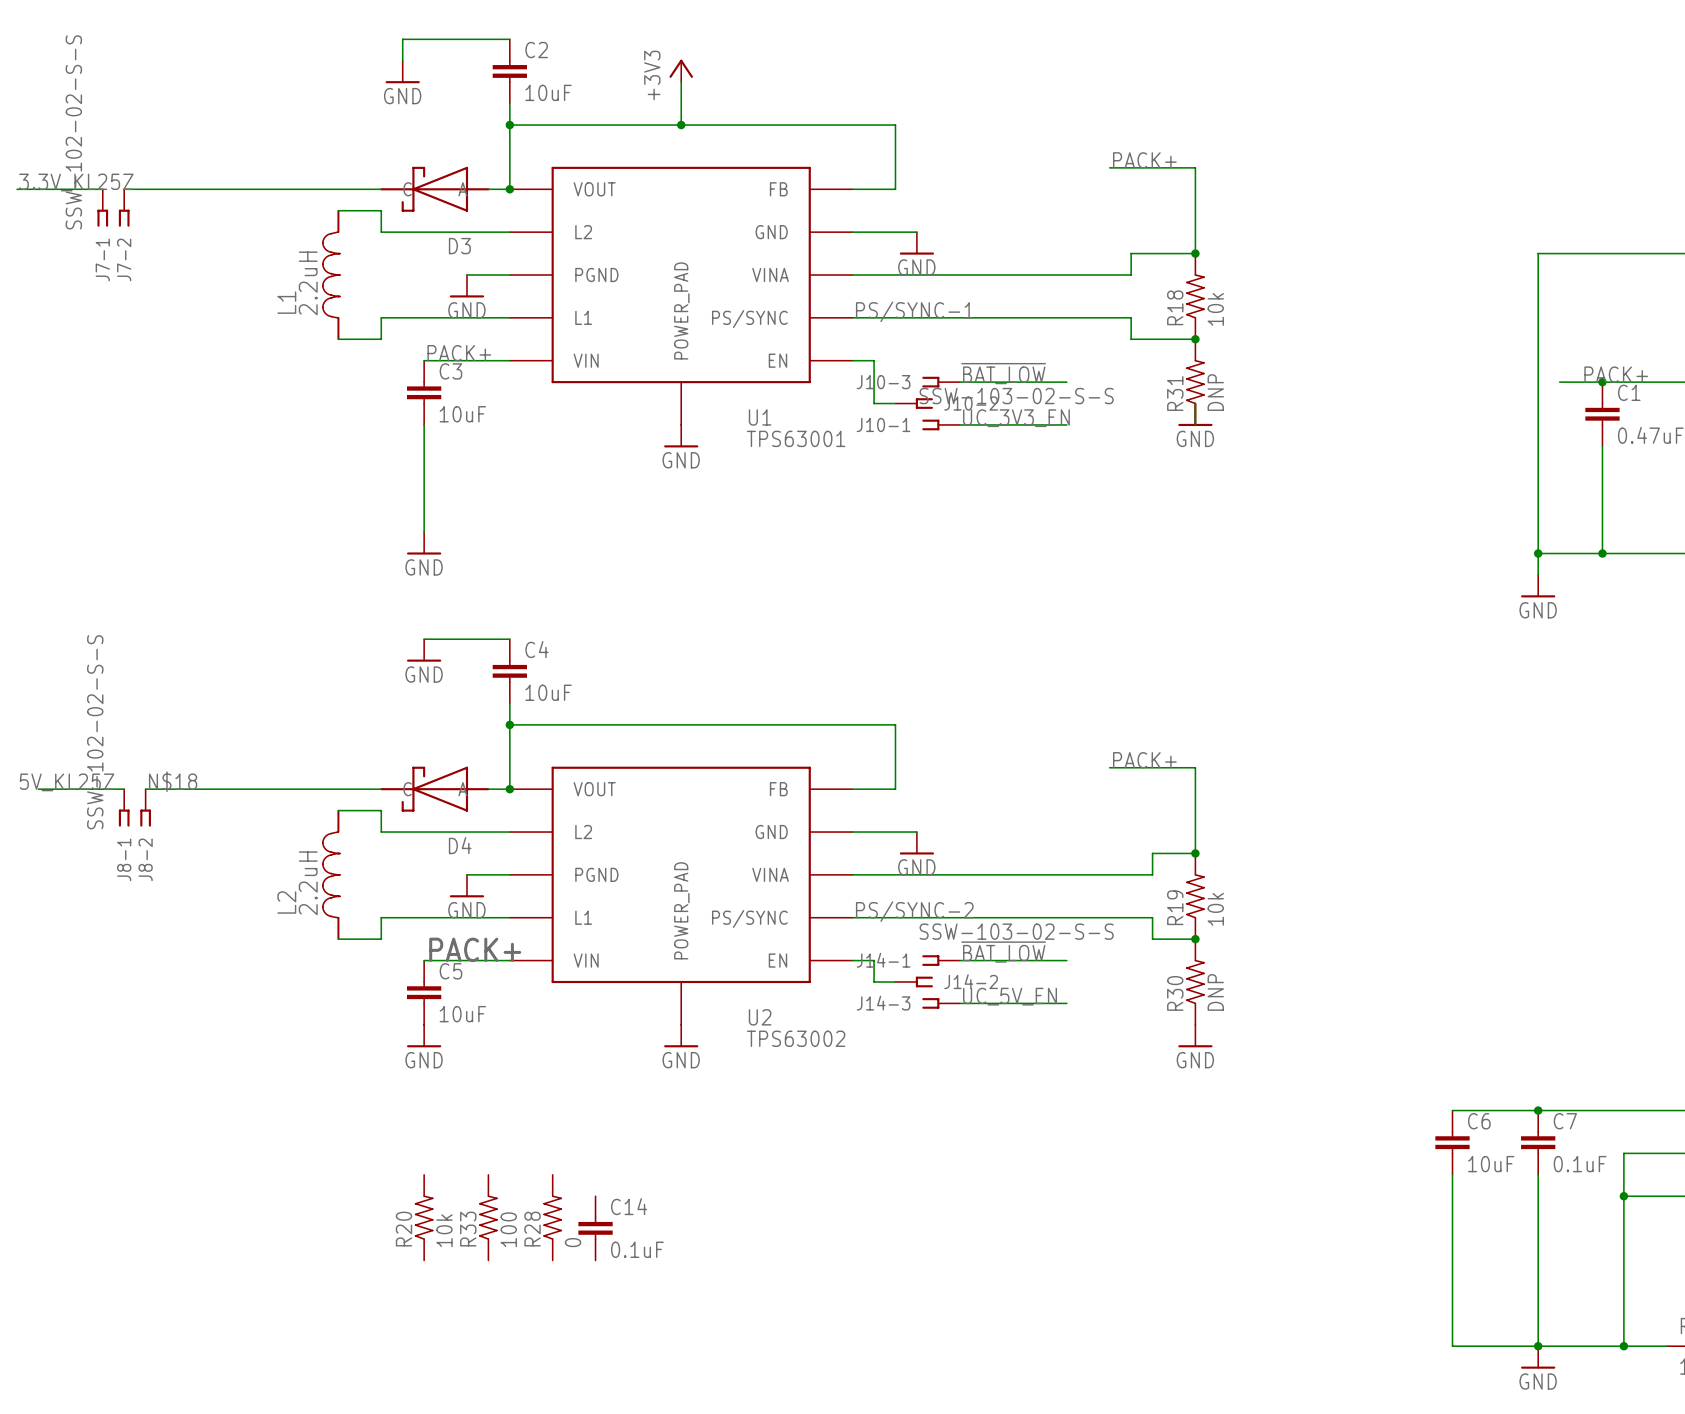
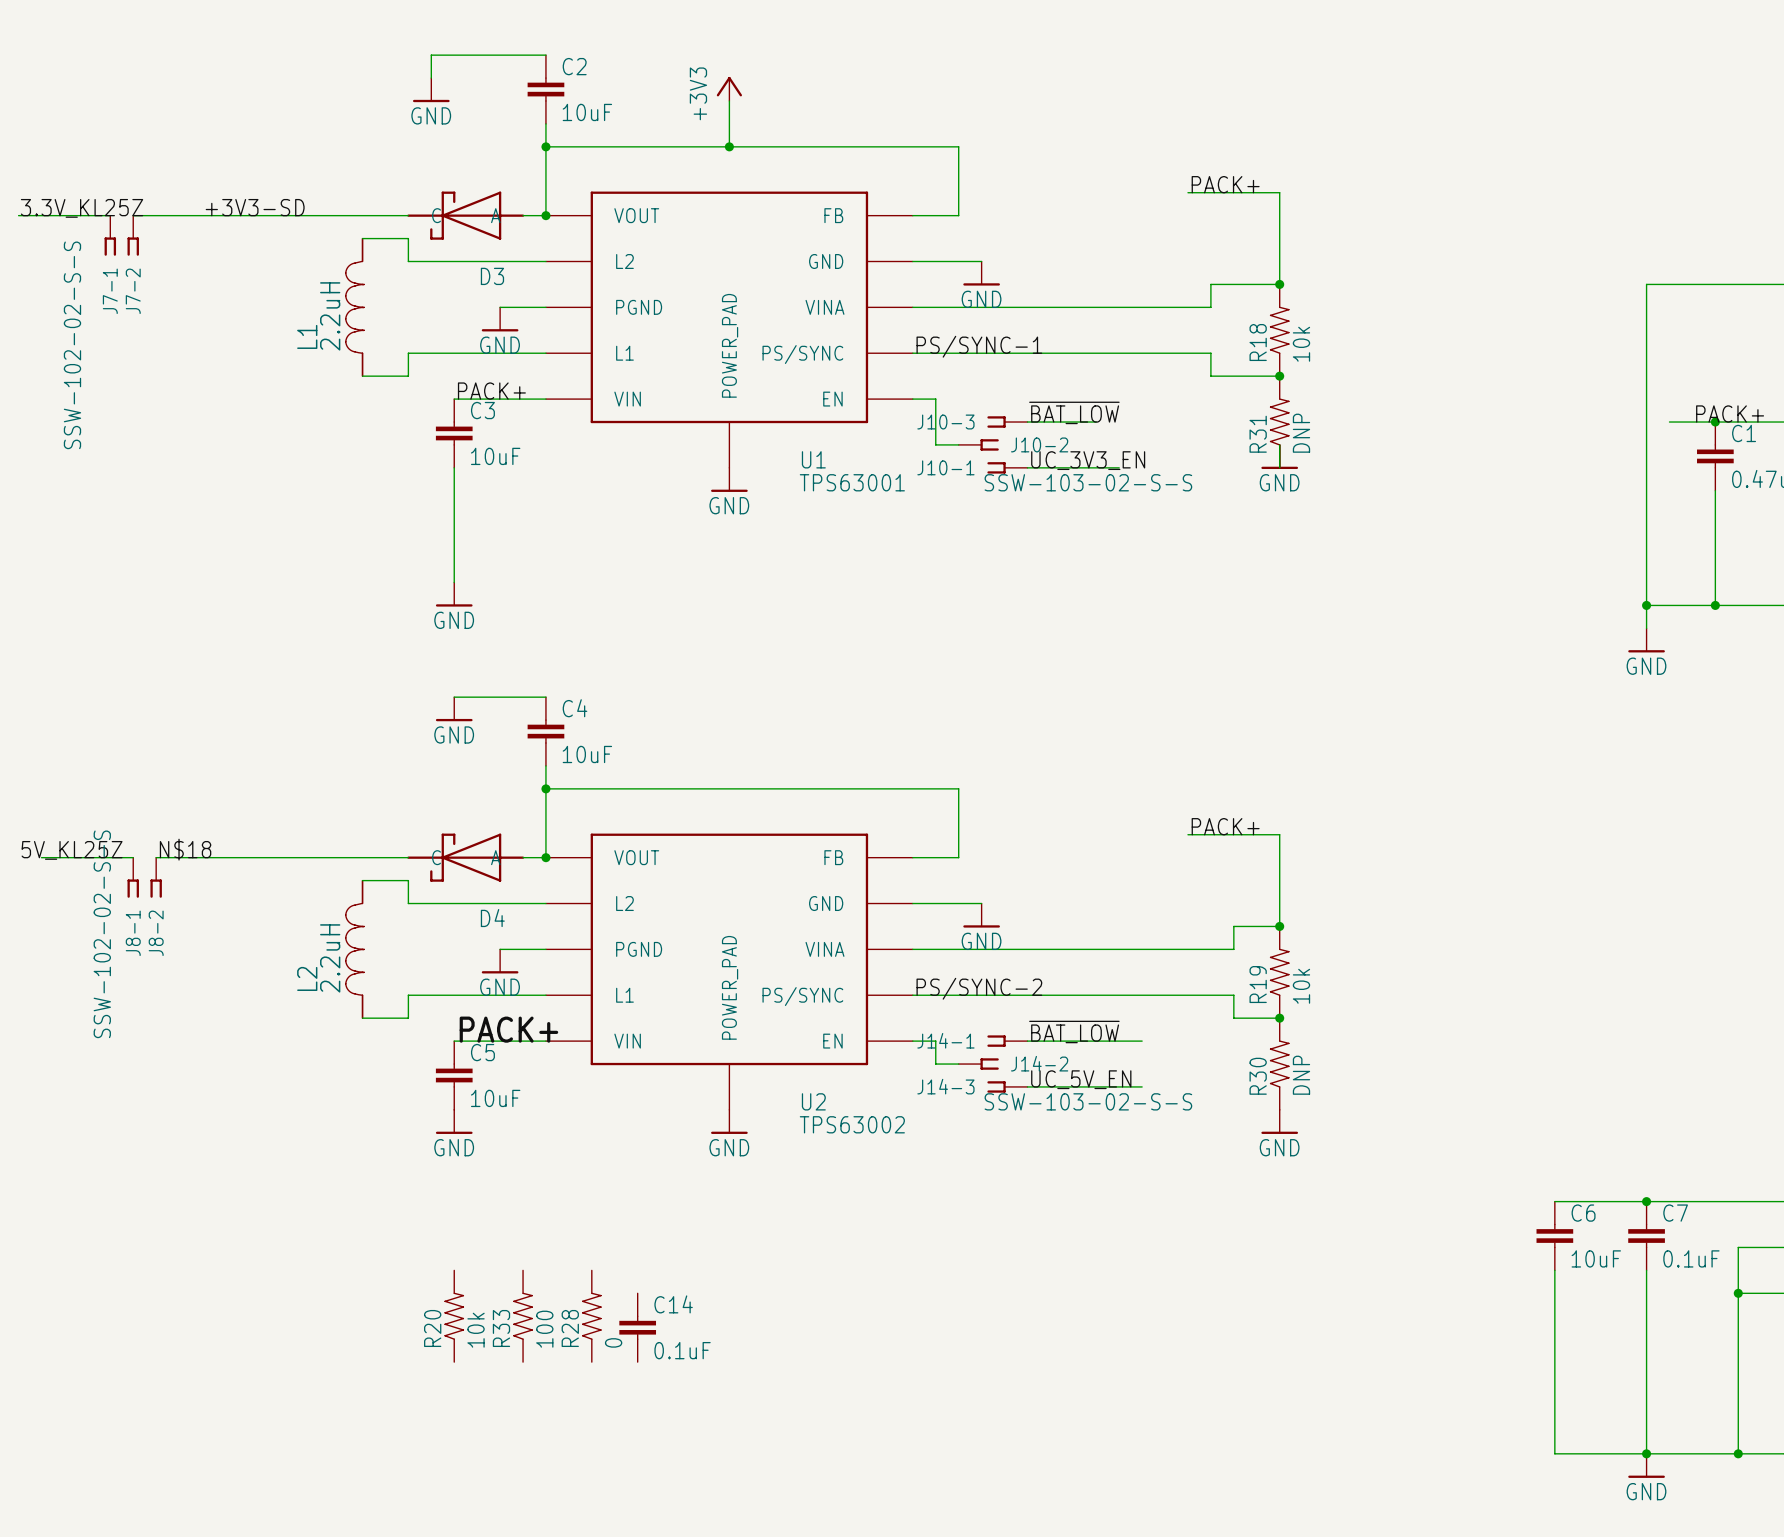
J7-1 value position: SSW-102-02-S-S (73, 132) -> SSW-102-02-S-S (72, 345)
label: none -> +3V3-SD (255, 207)
wire: (1024, 382) (1066, 382) -> none
J10-1 value position: SSW-103-02-S-S (1016, 396) -> SSW-103-02-S-S (1088, 482)
wire: (1045, 424) (1066, 424) -> none
J8-1 value position: SSW-102-02-S-S (95, 732) -> SSW-102-02-S-S (102, 934)
J14-1 value position: SSW-103-02-S-S (1016, 931) -> SSW-103-02-S-S (1088, 1101)

